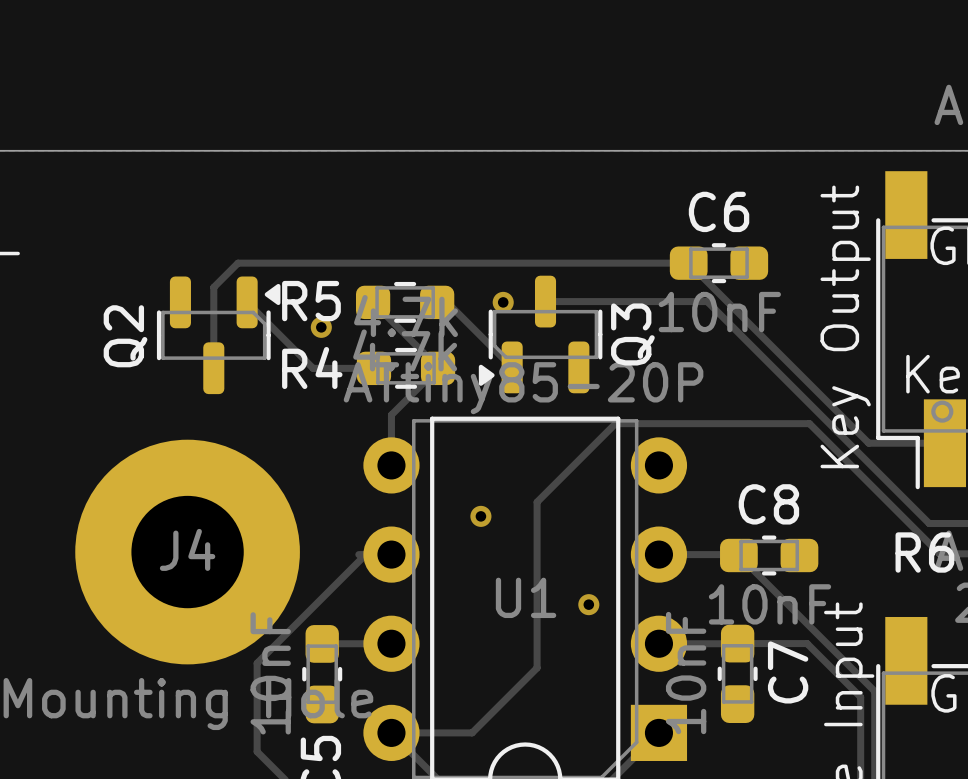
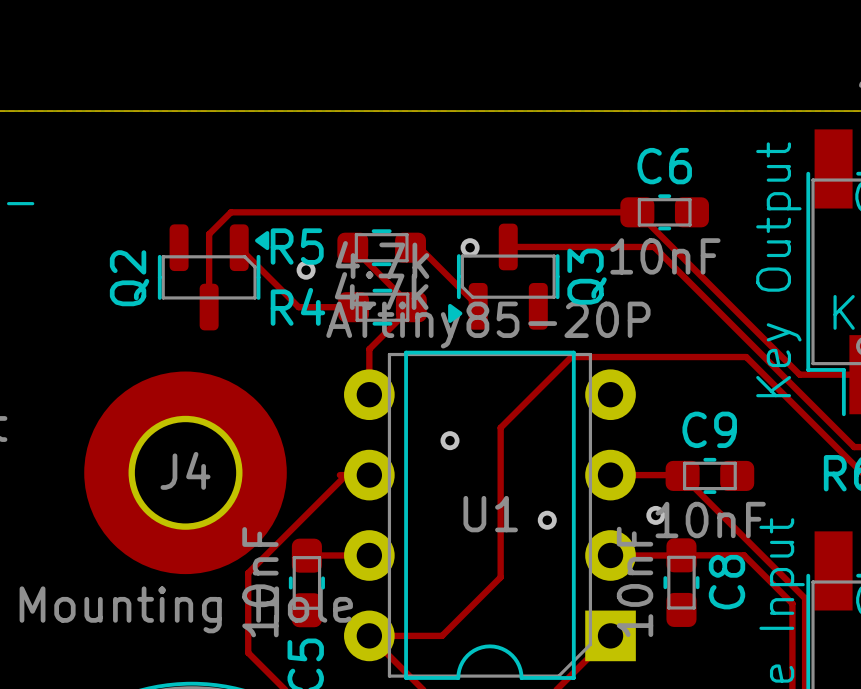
C8 name: C8 (768, 504) -> C9 (709, 429)
via: none -> (655, 515)
C7 name: C7 (788, 672) -> C8 (726, 582)

